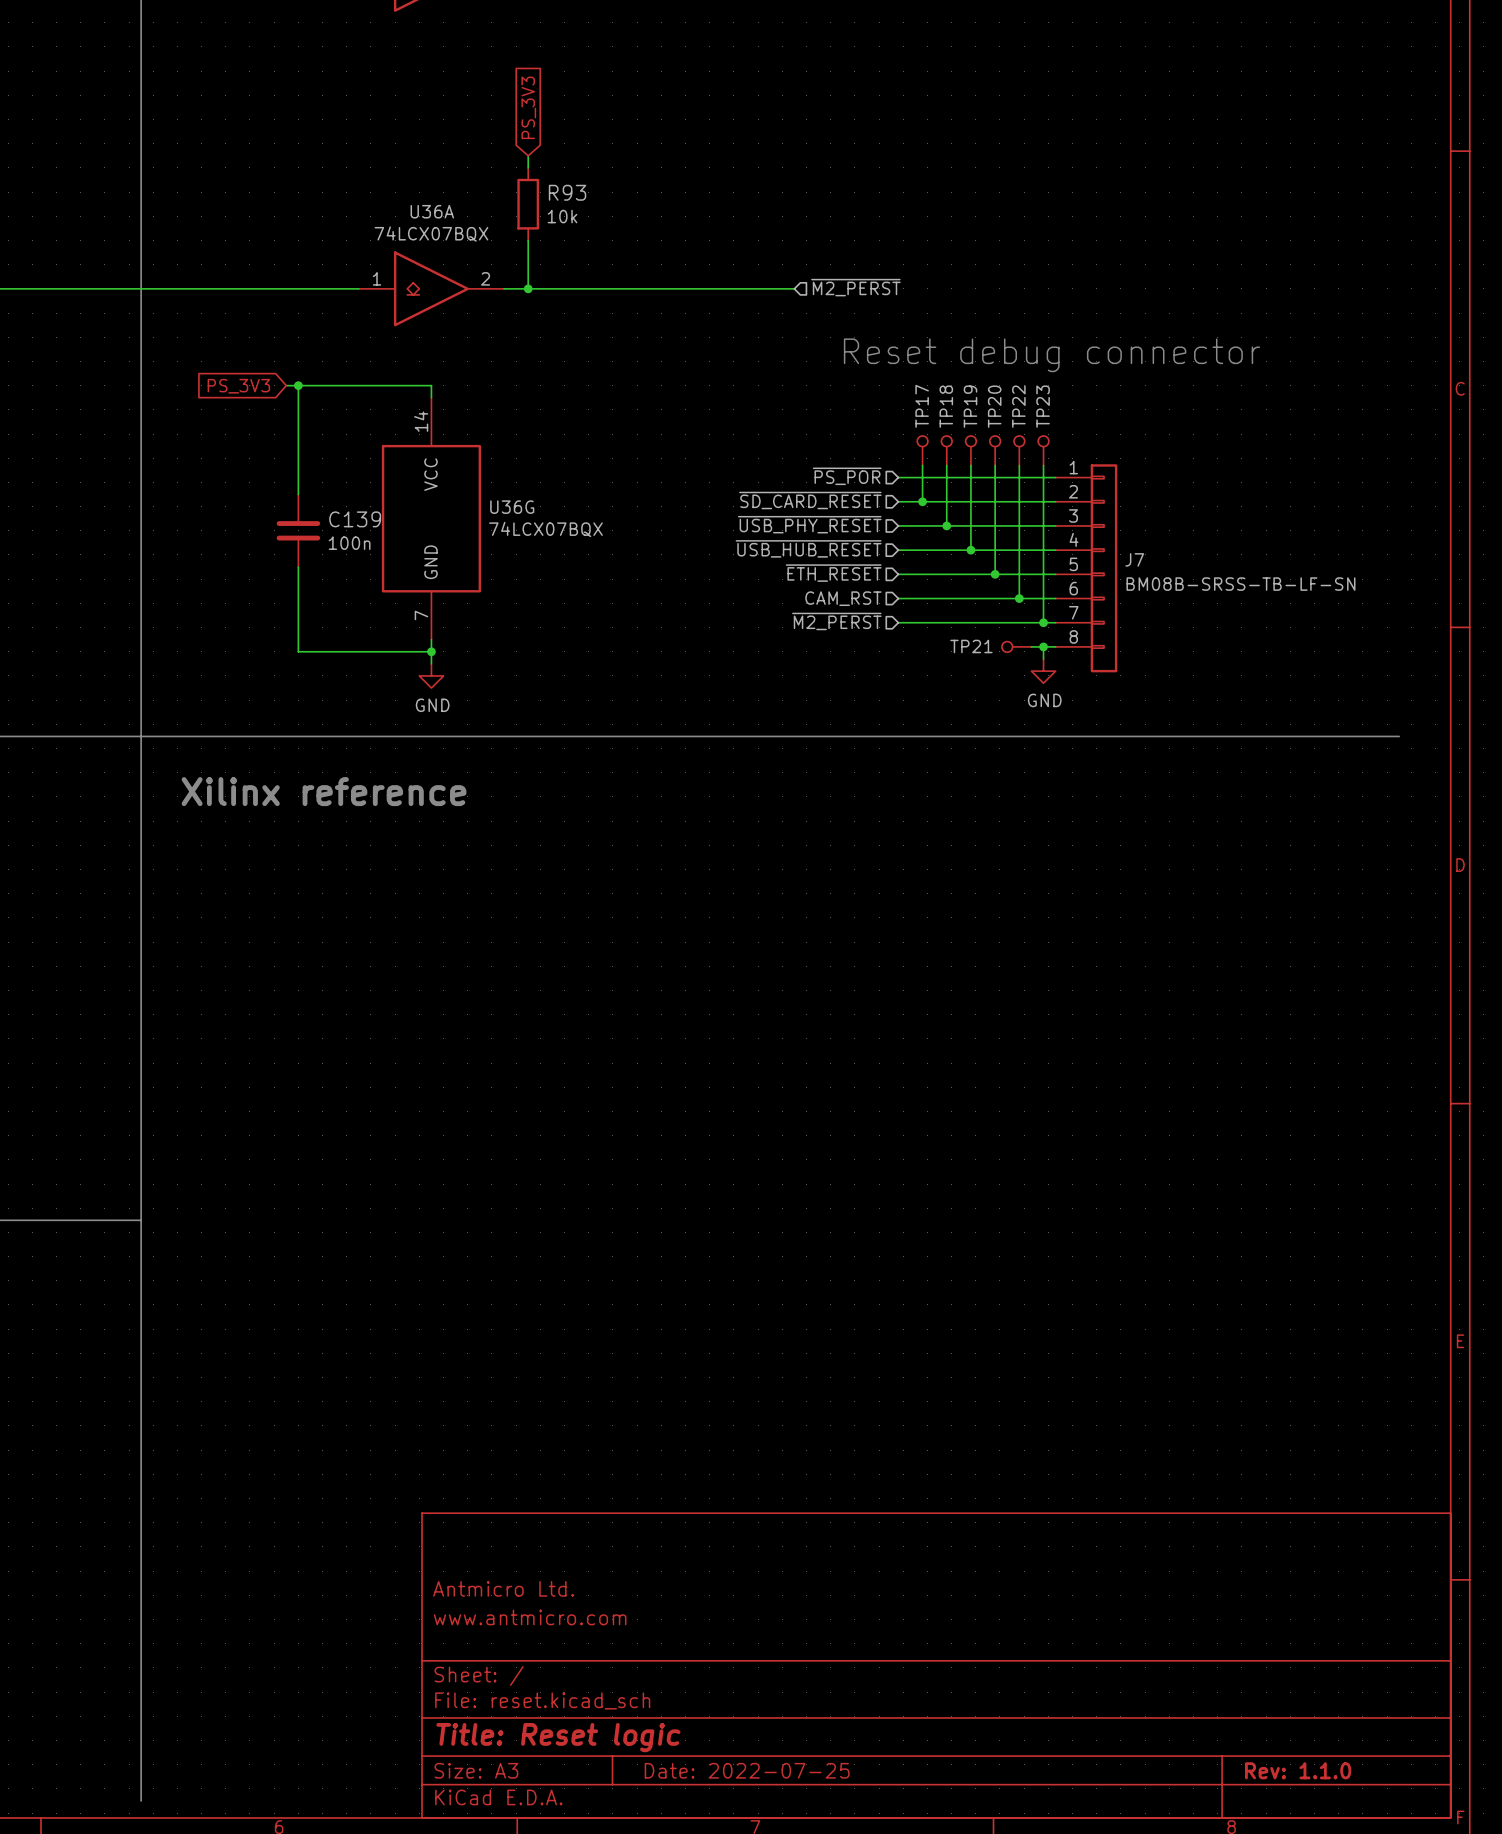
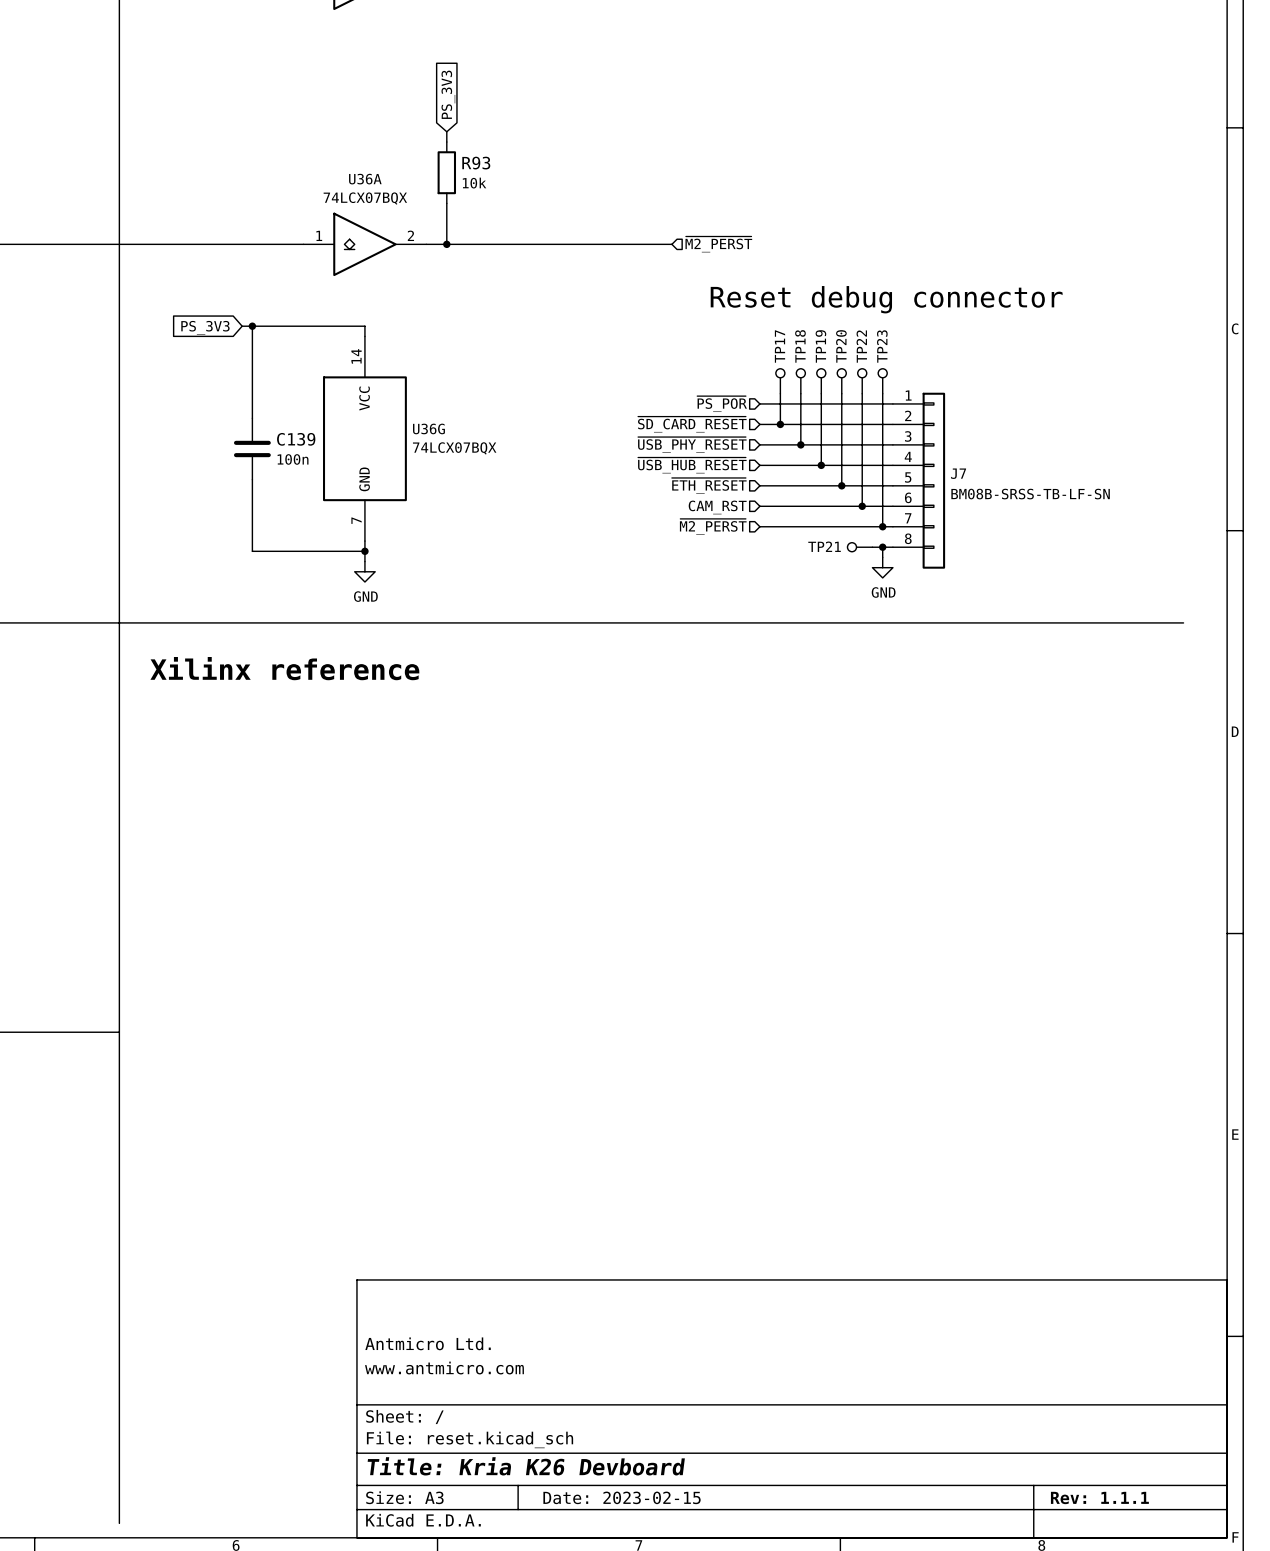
title block: Title: Reset logic (558, 1737) -> Title: Kria K26 Devboard (526, 1466)
title block: Date: 2022-07-25 (747, 1770) -> Date: 2023-02-15 (622, 1497)
title block: Rev: 1.1.0 (1298, 1770) -> Rev: 1.1.1 (1099, 1497)

